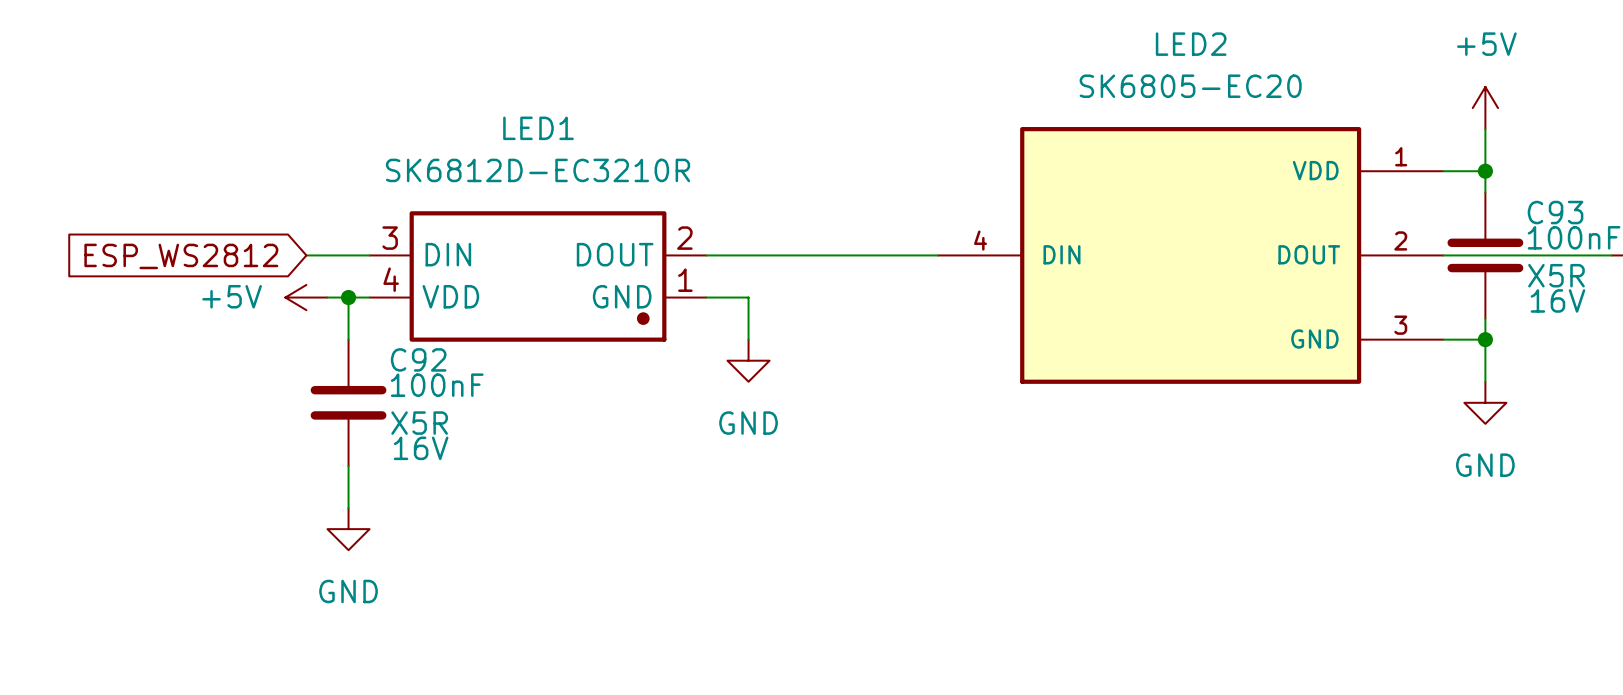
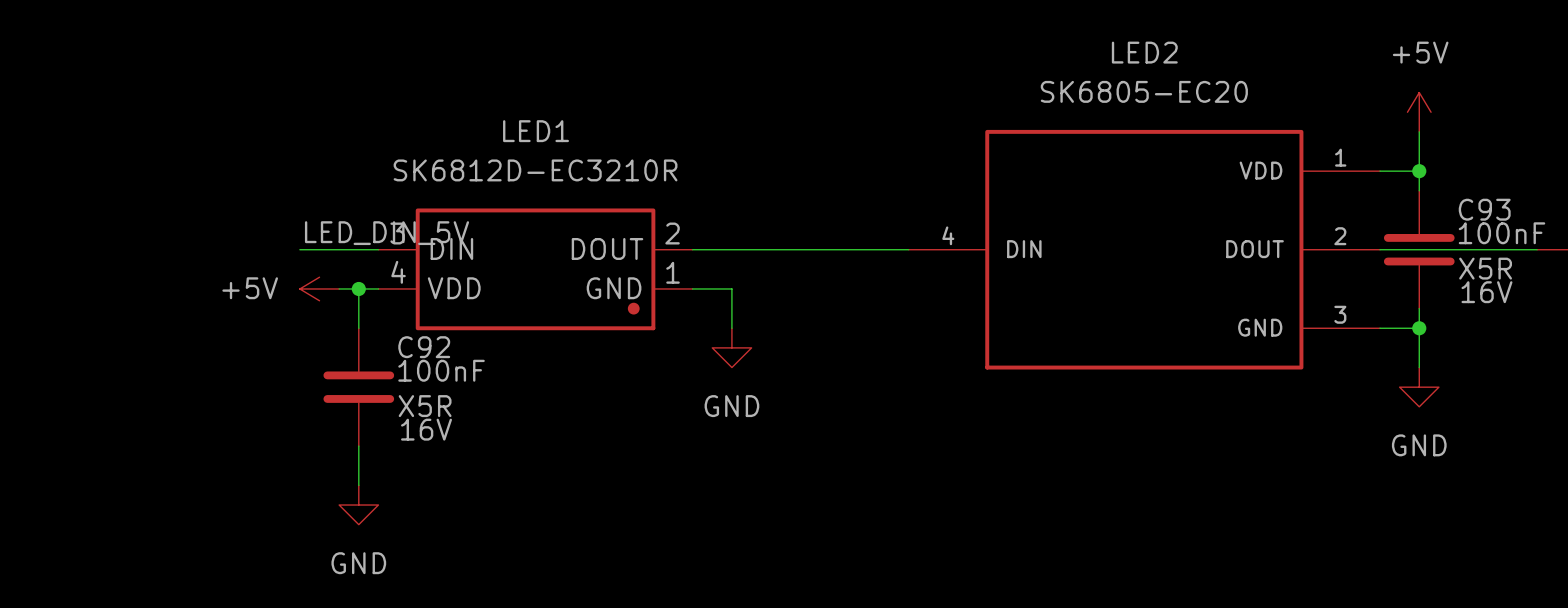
label: none -> LED_DIN_5V (387, 233)
wire: none -> (299, 249) (319, 249)
global label: ESP_WS2812 (181, 256) -> none

